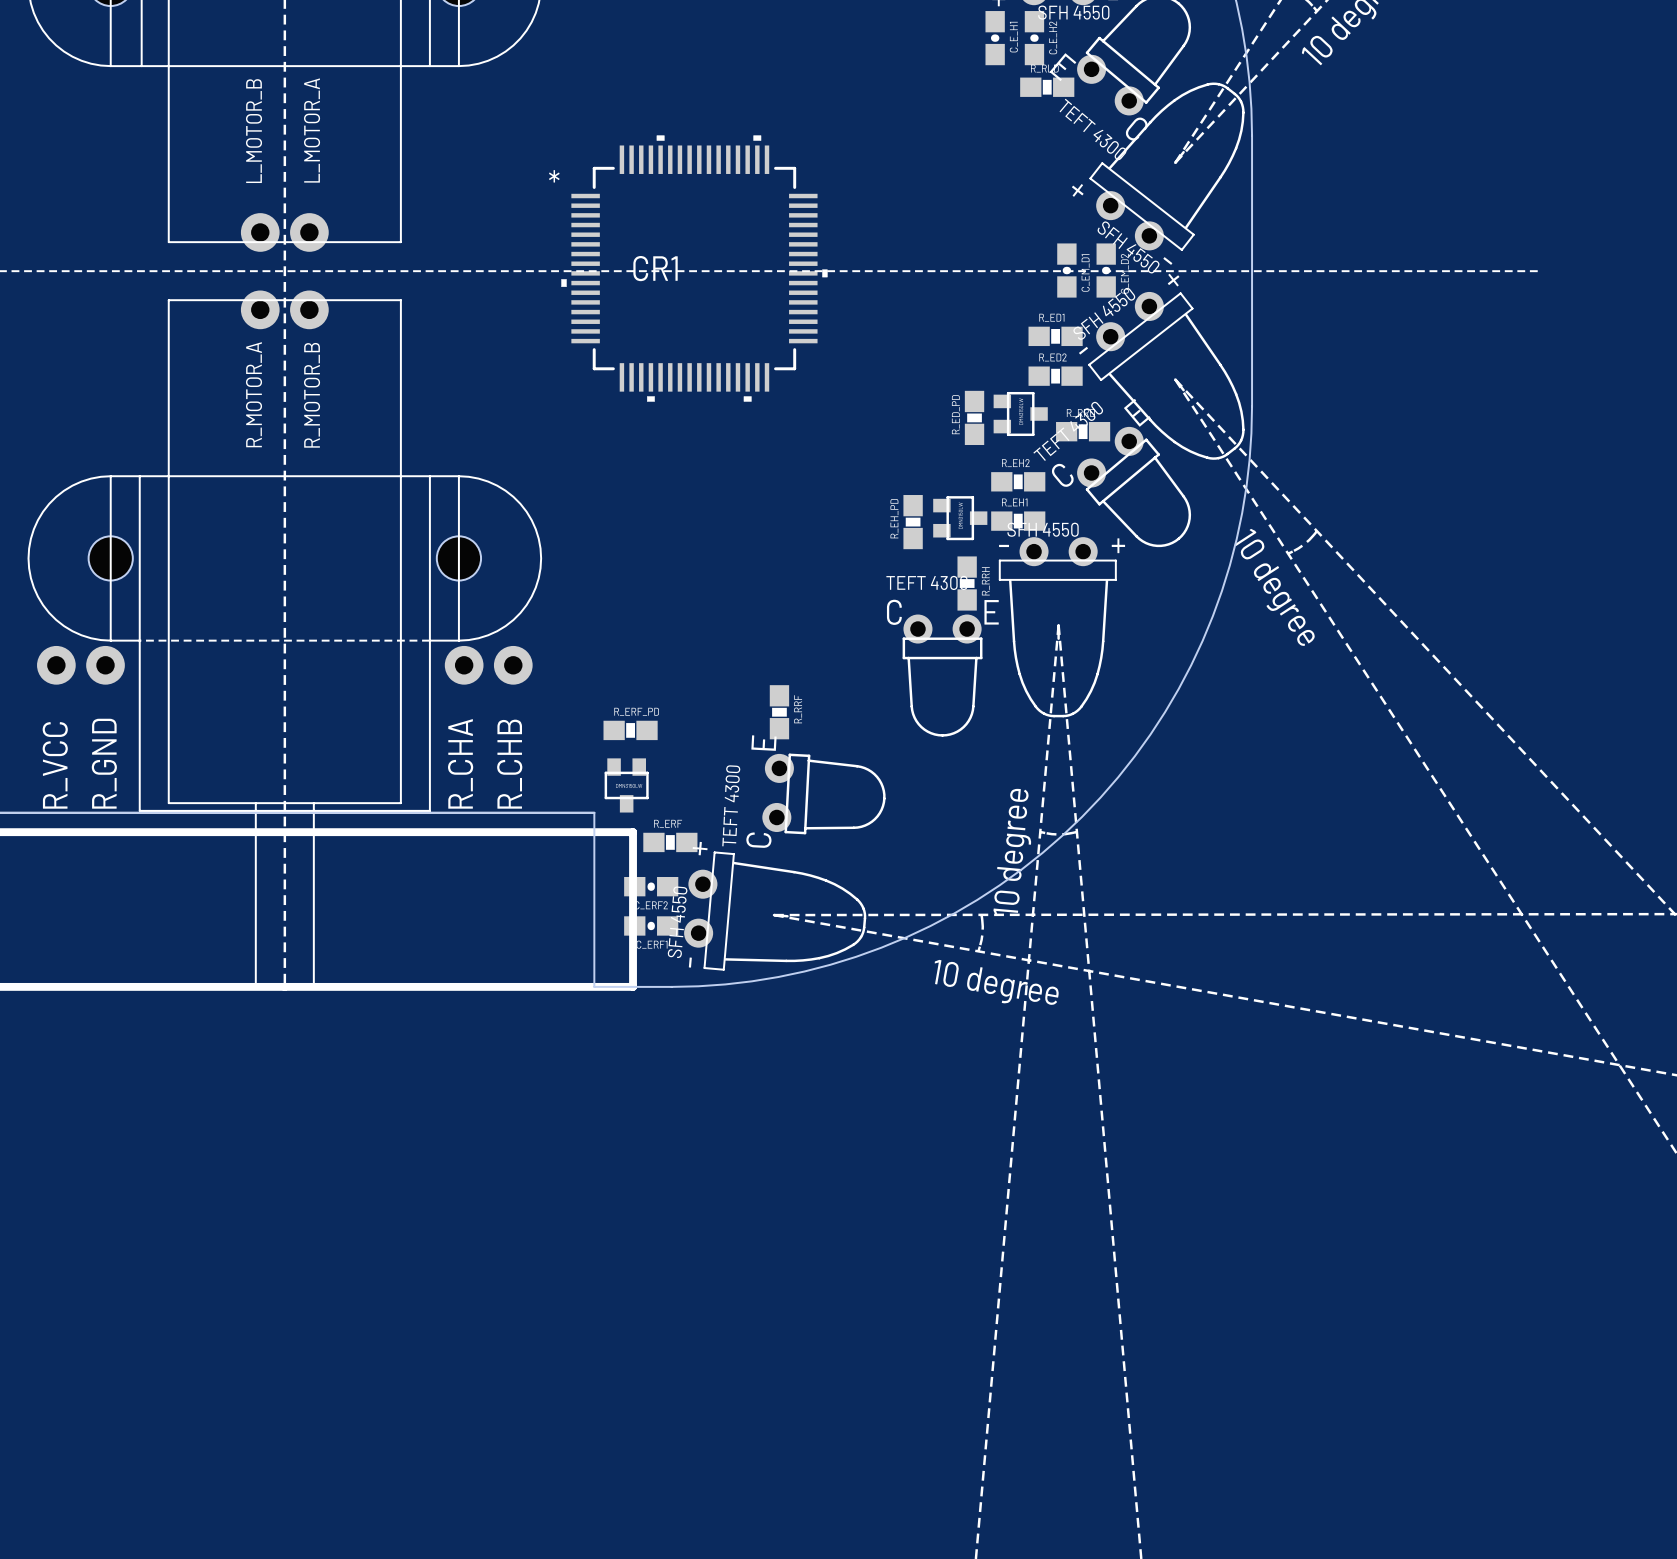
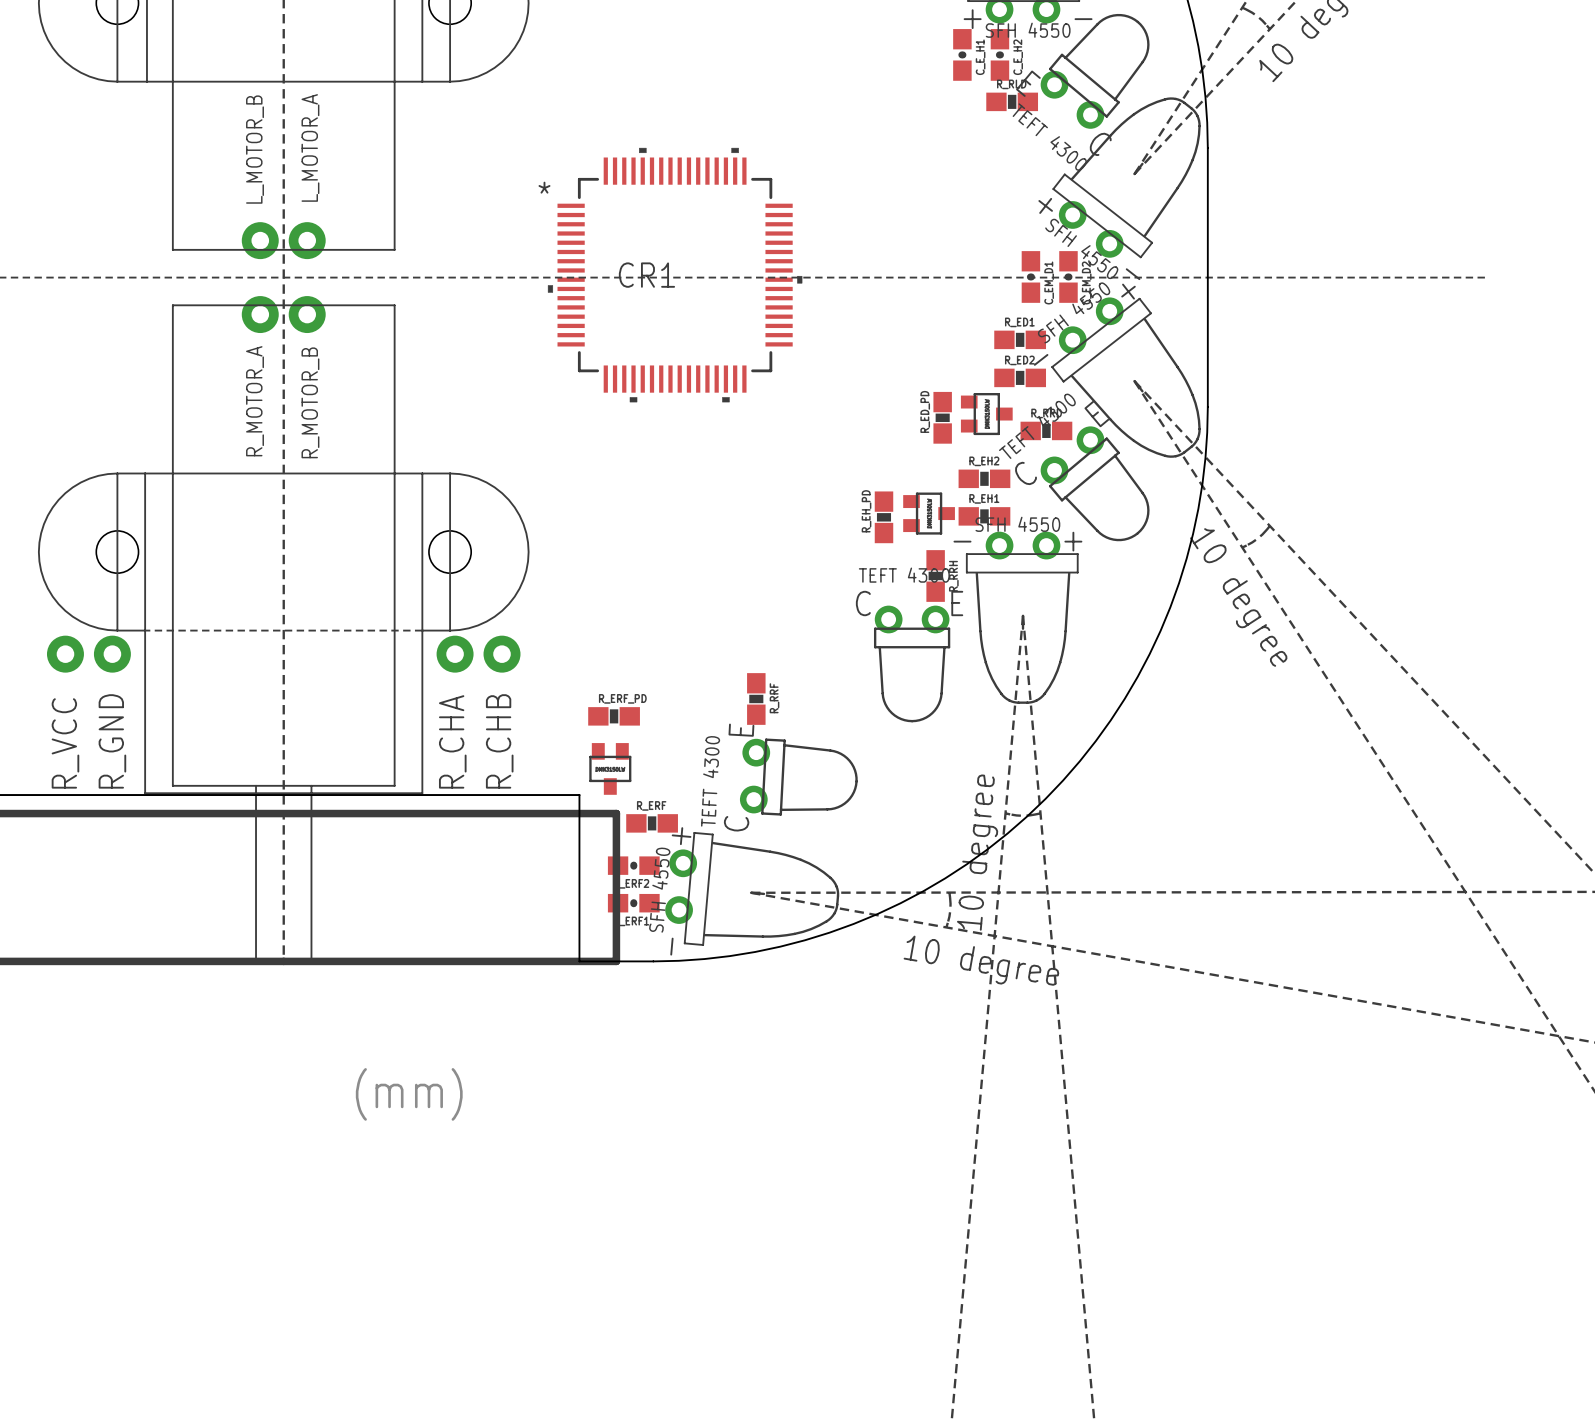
text: none -> (mm) (409, 1094)

